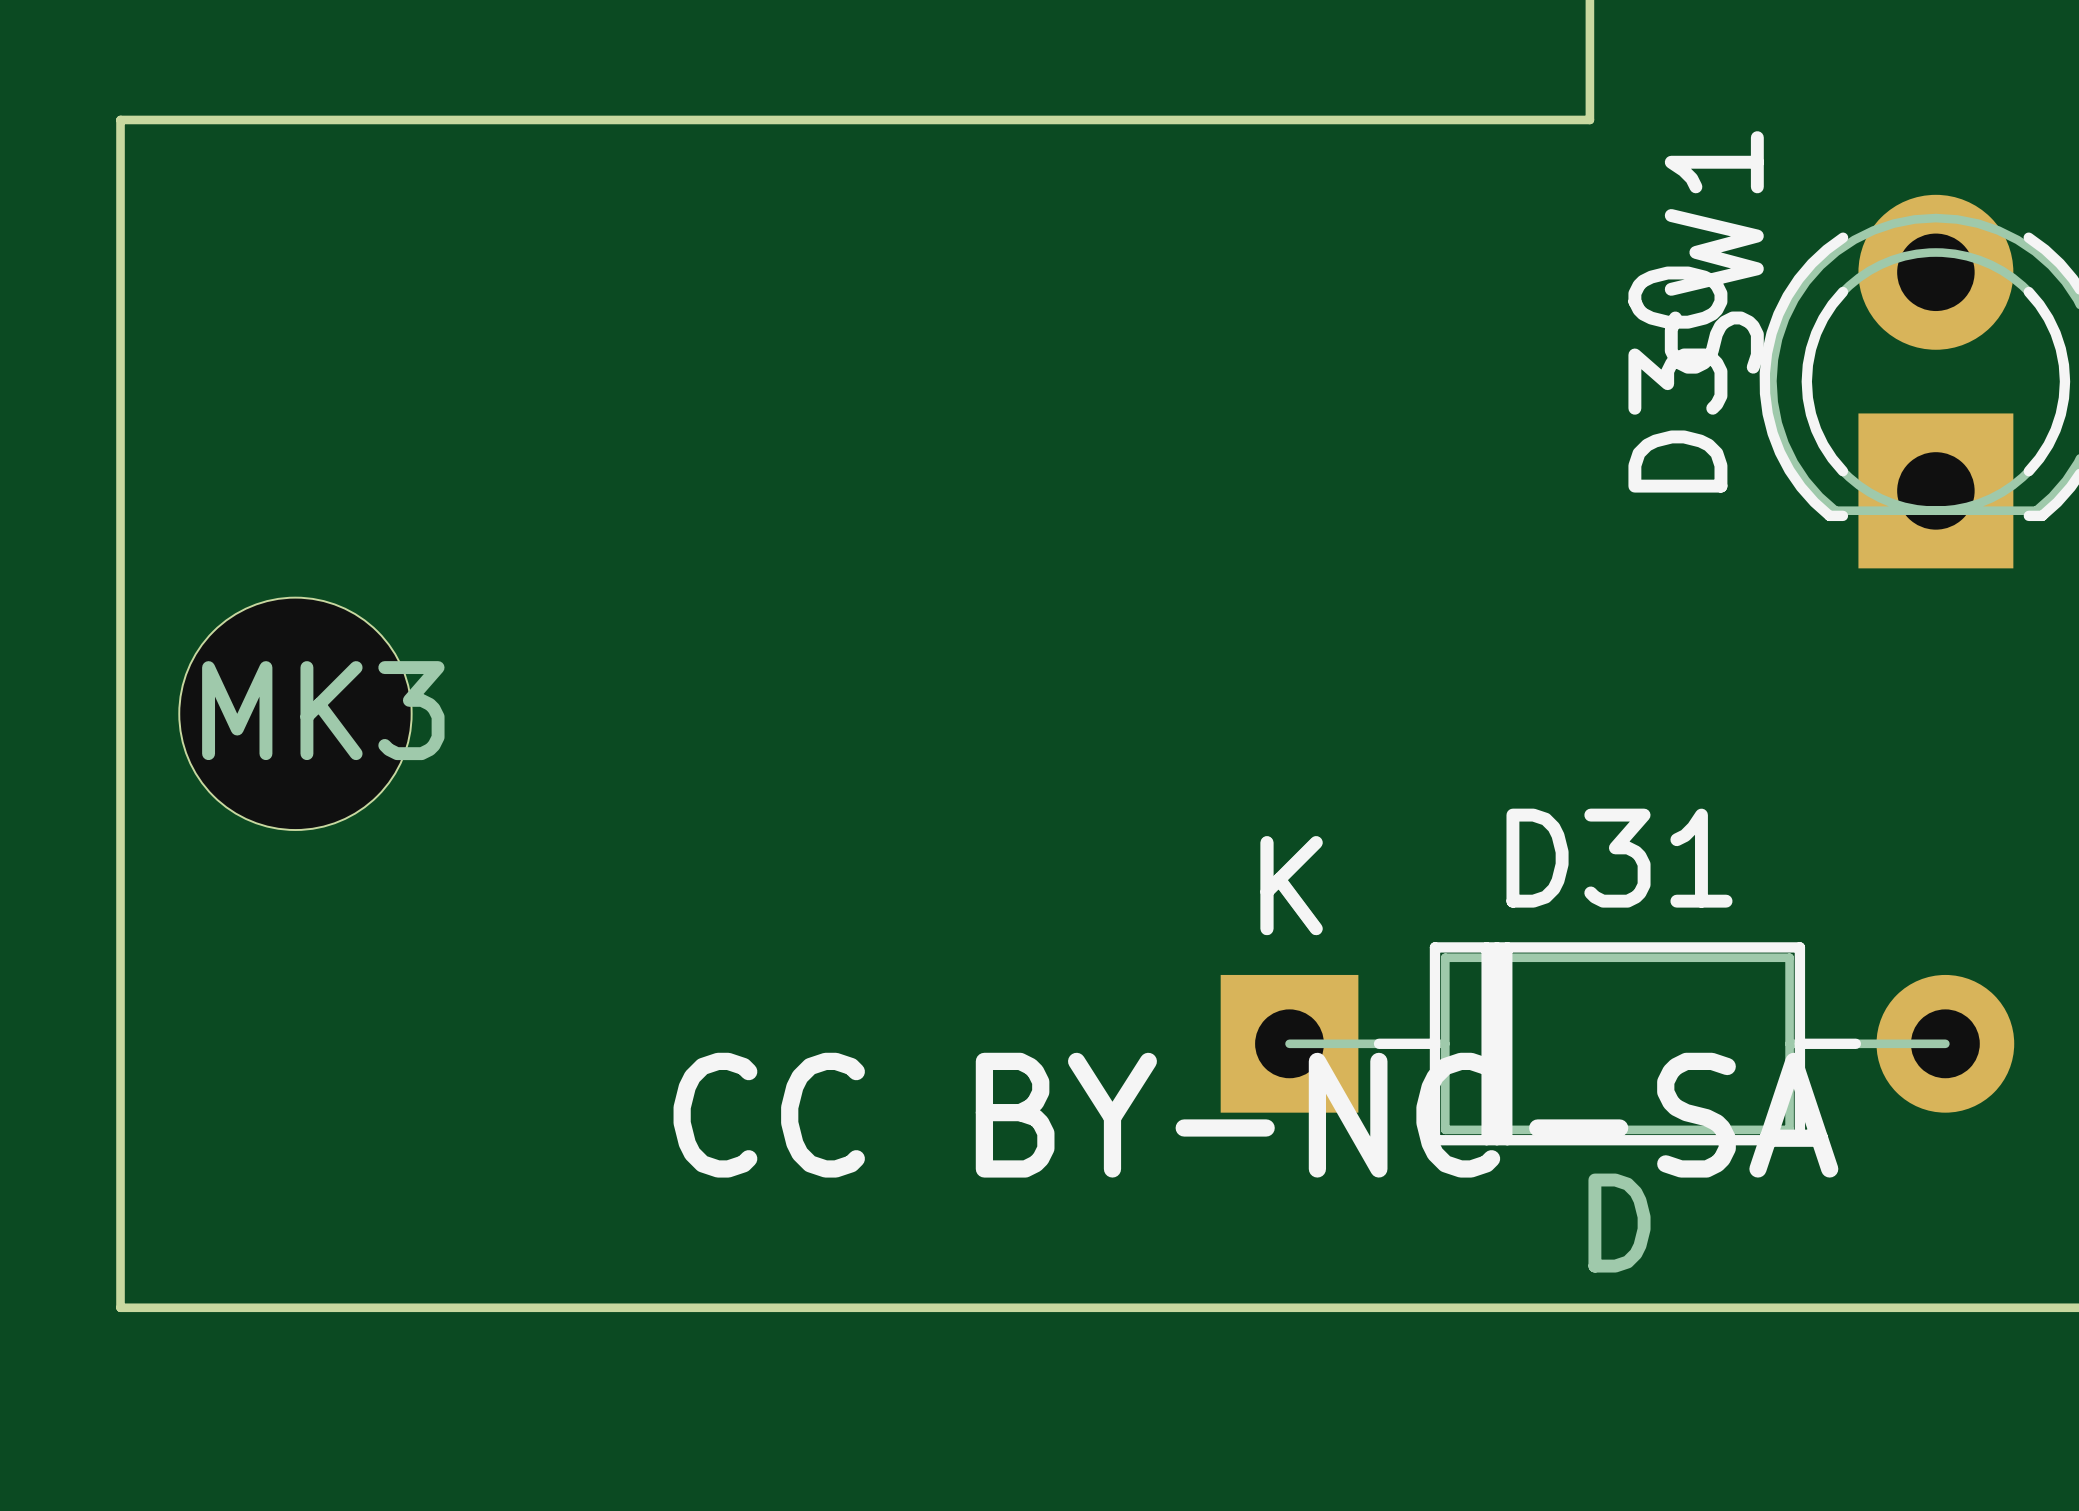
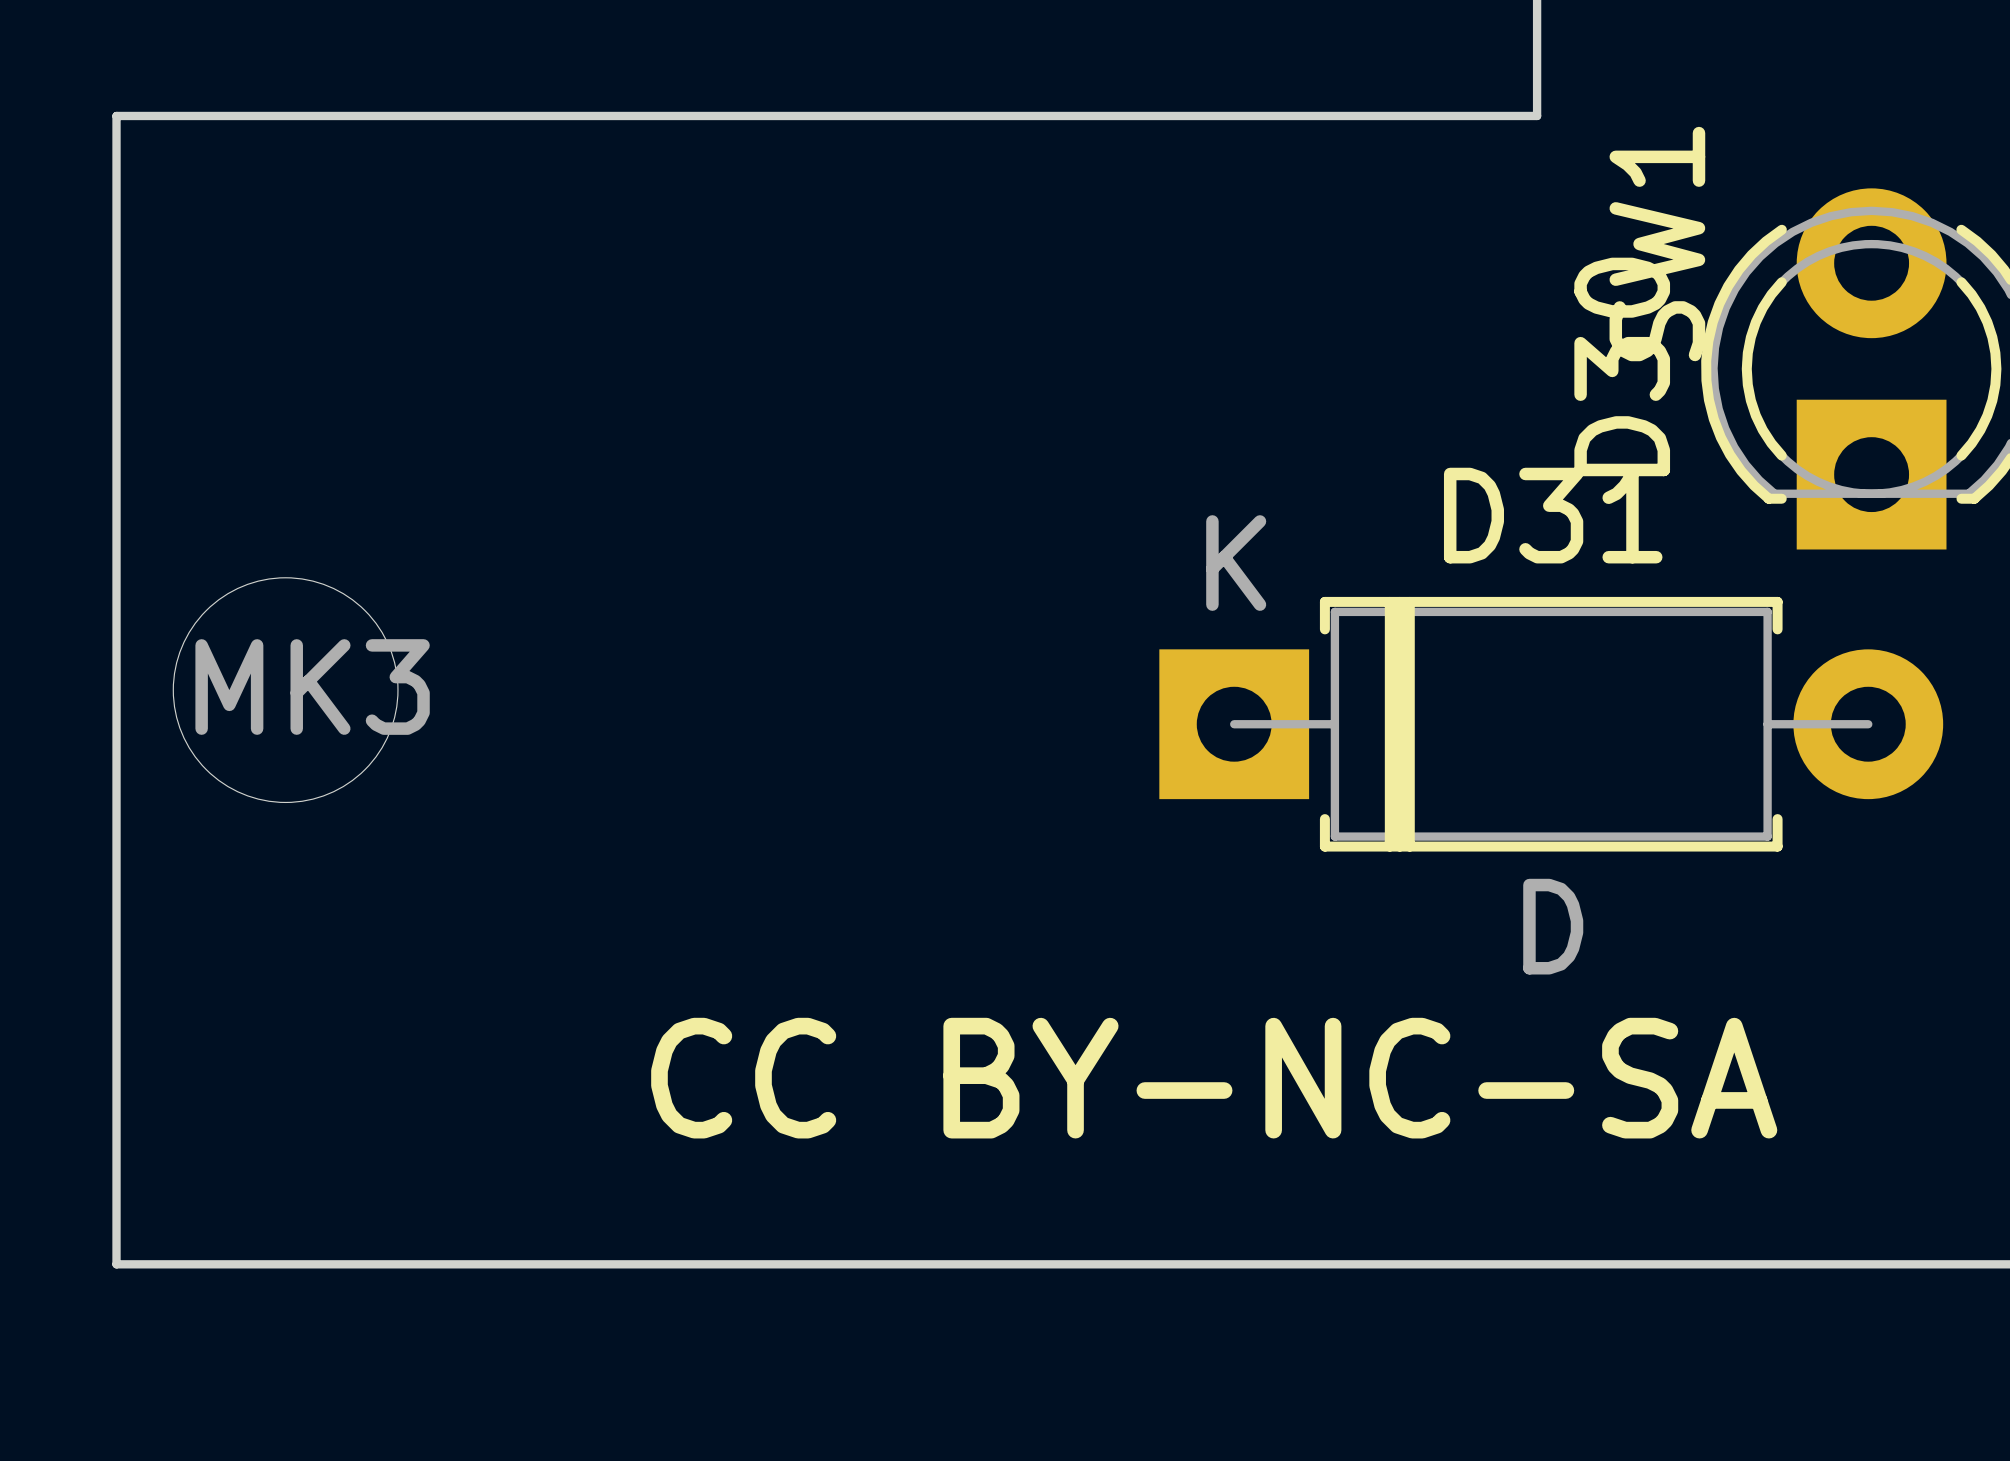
D31 footprint: [1220, 942, 2015, 1146] -> [1159, 596, 1944, 852]

